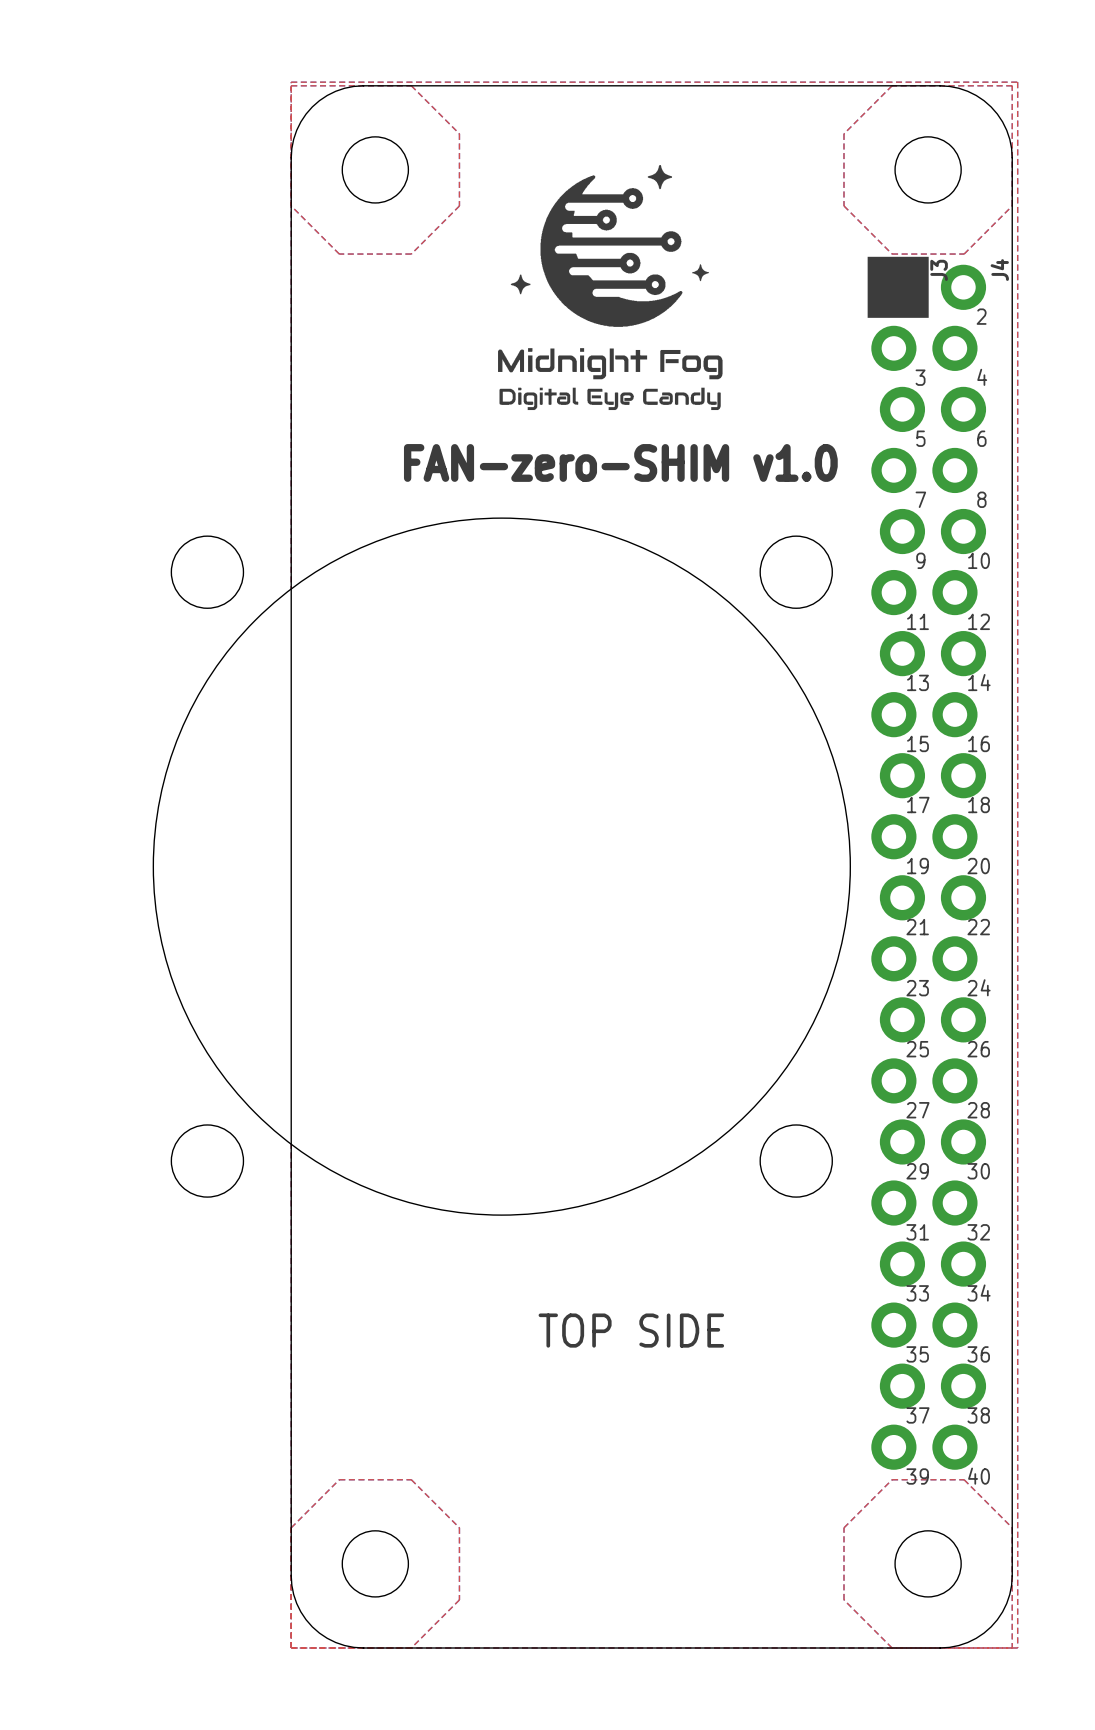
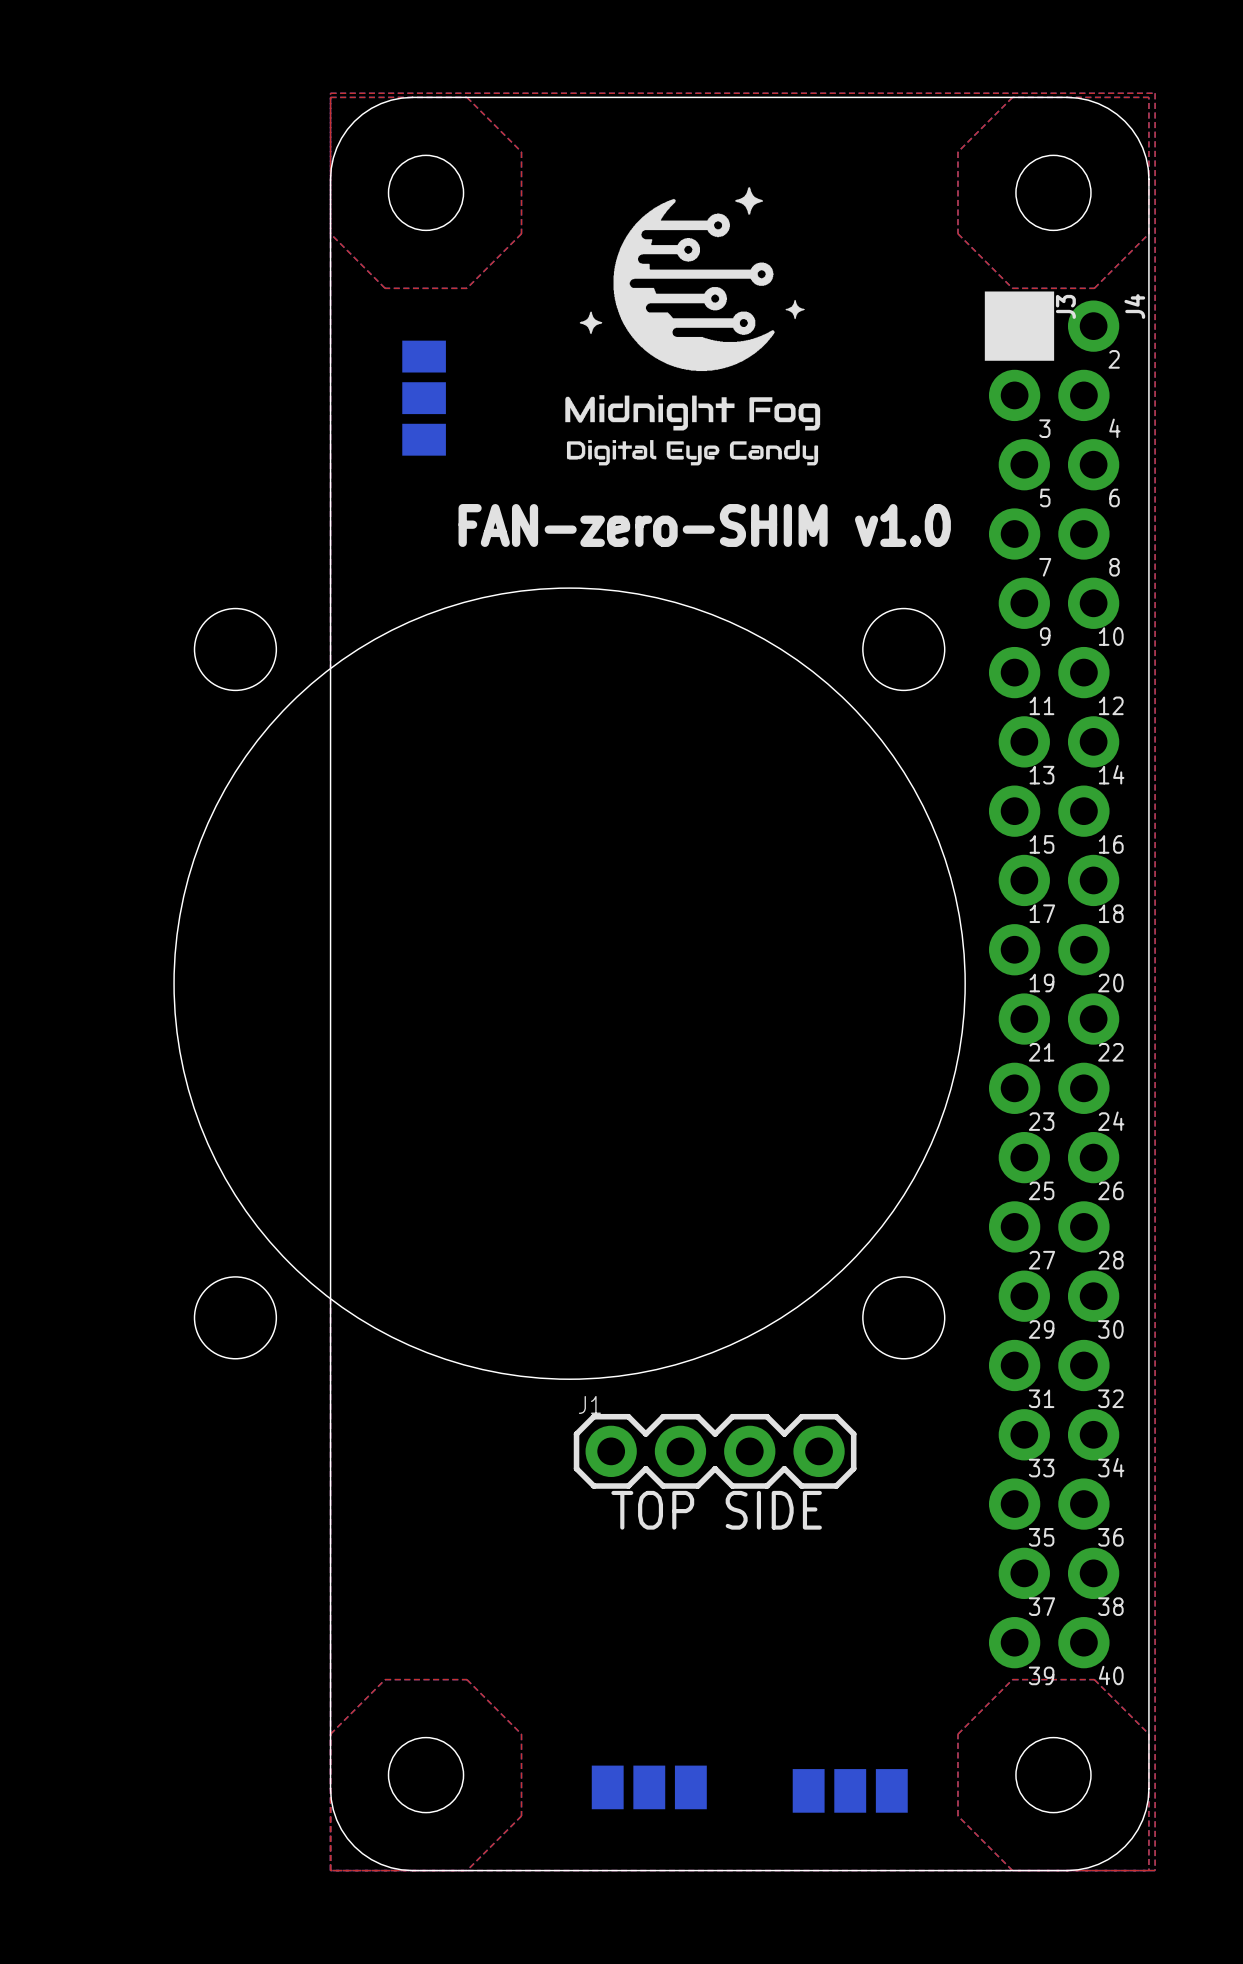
part: none -> (424, 398)
J1: none -> (715, 1451)
part: none -> (649, 1787)
part: none -> (850, 1790)

